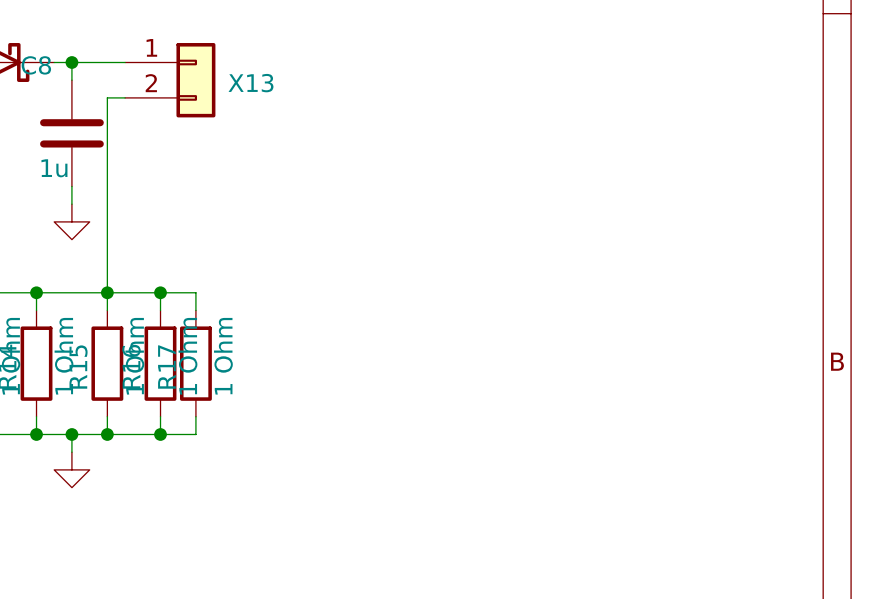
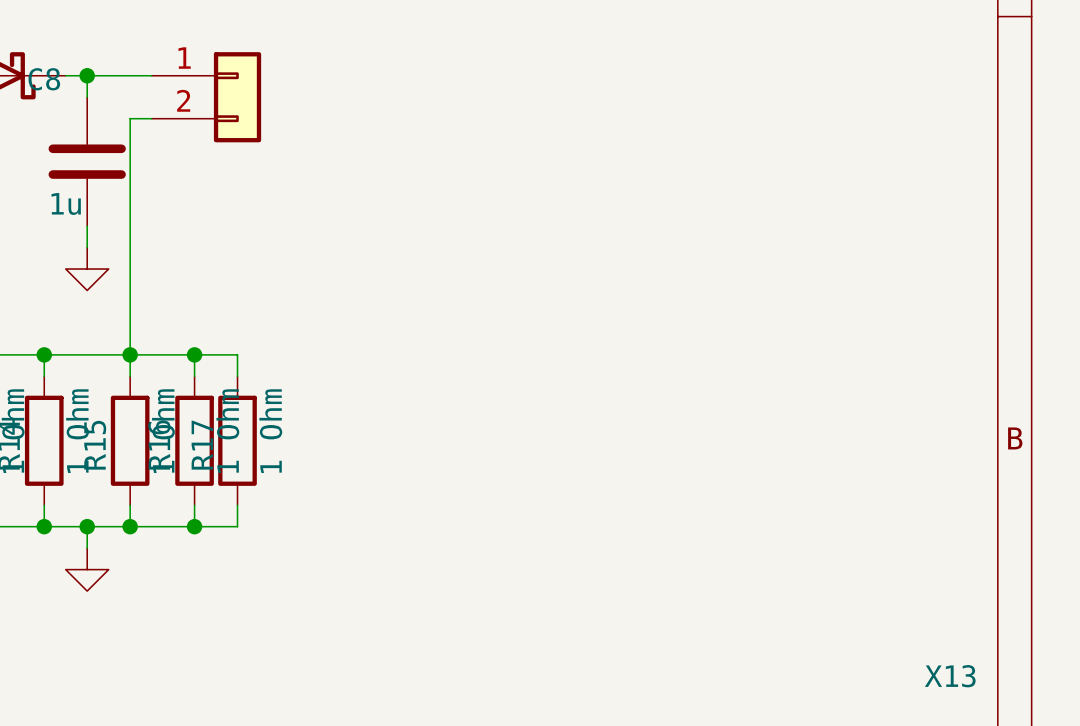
X13 name position: X13 (250, 83) -> X13 (950, 676)

